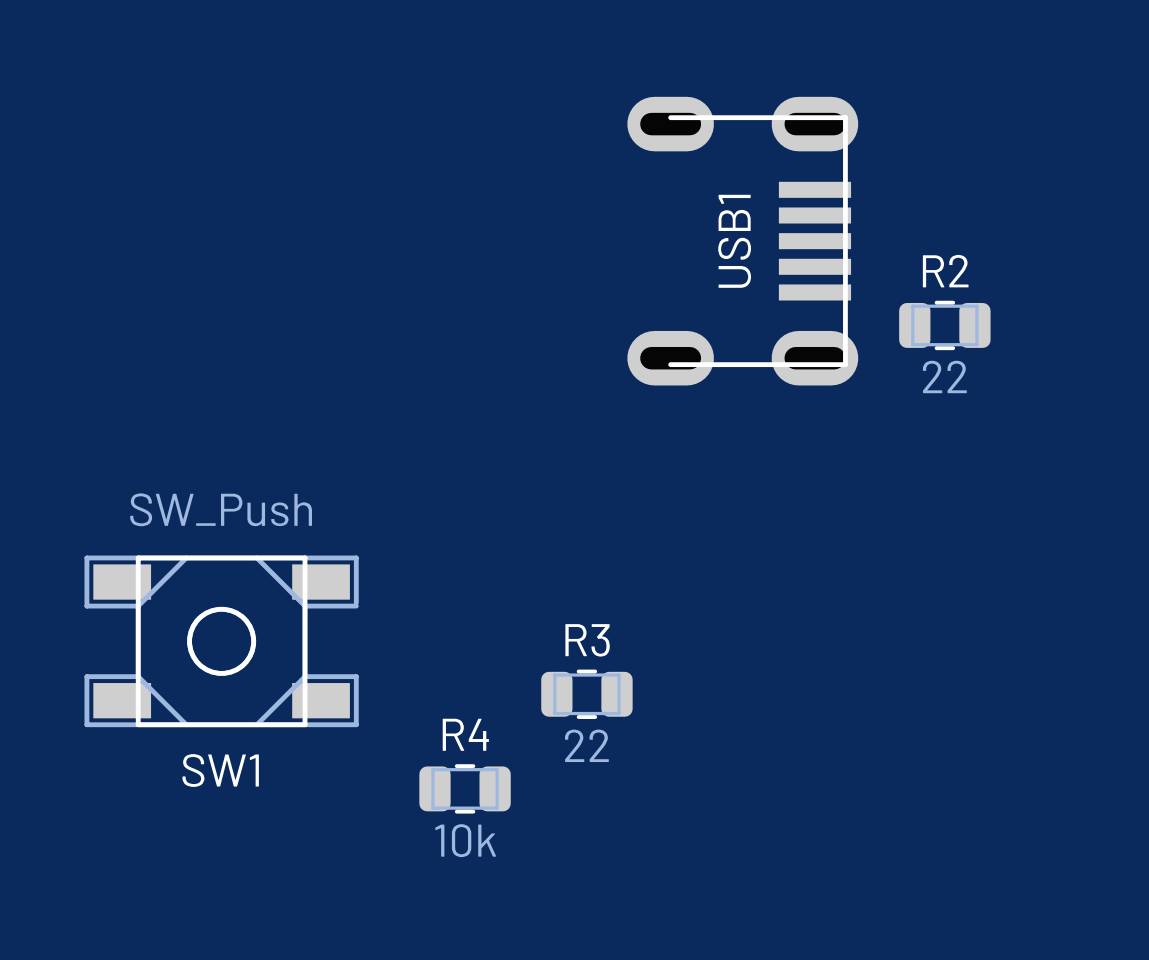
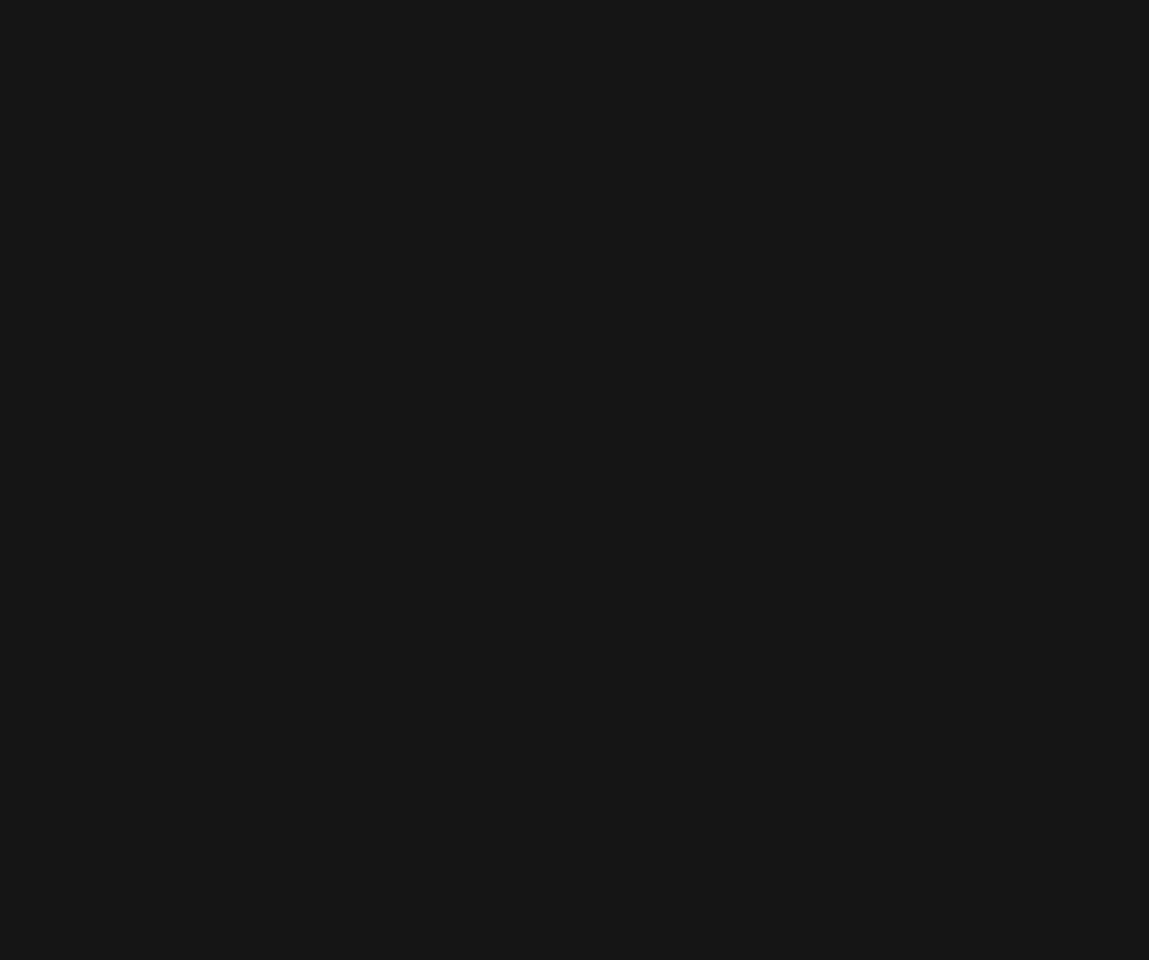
USB1: (742, 241) -> none
R2: 22 (944, 325) -> none
SW1: SW_Push (221, 641) -> none
R3: 22 (586, 694) -> none
R4: 10k (465, 788) -> none

